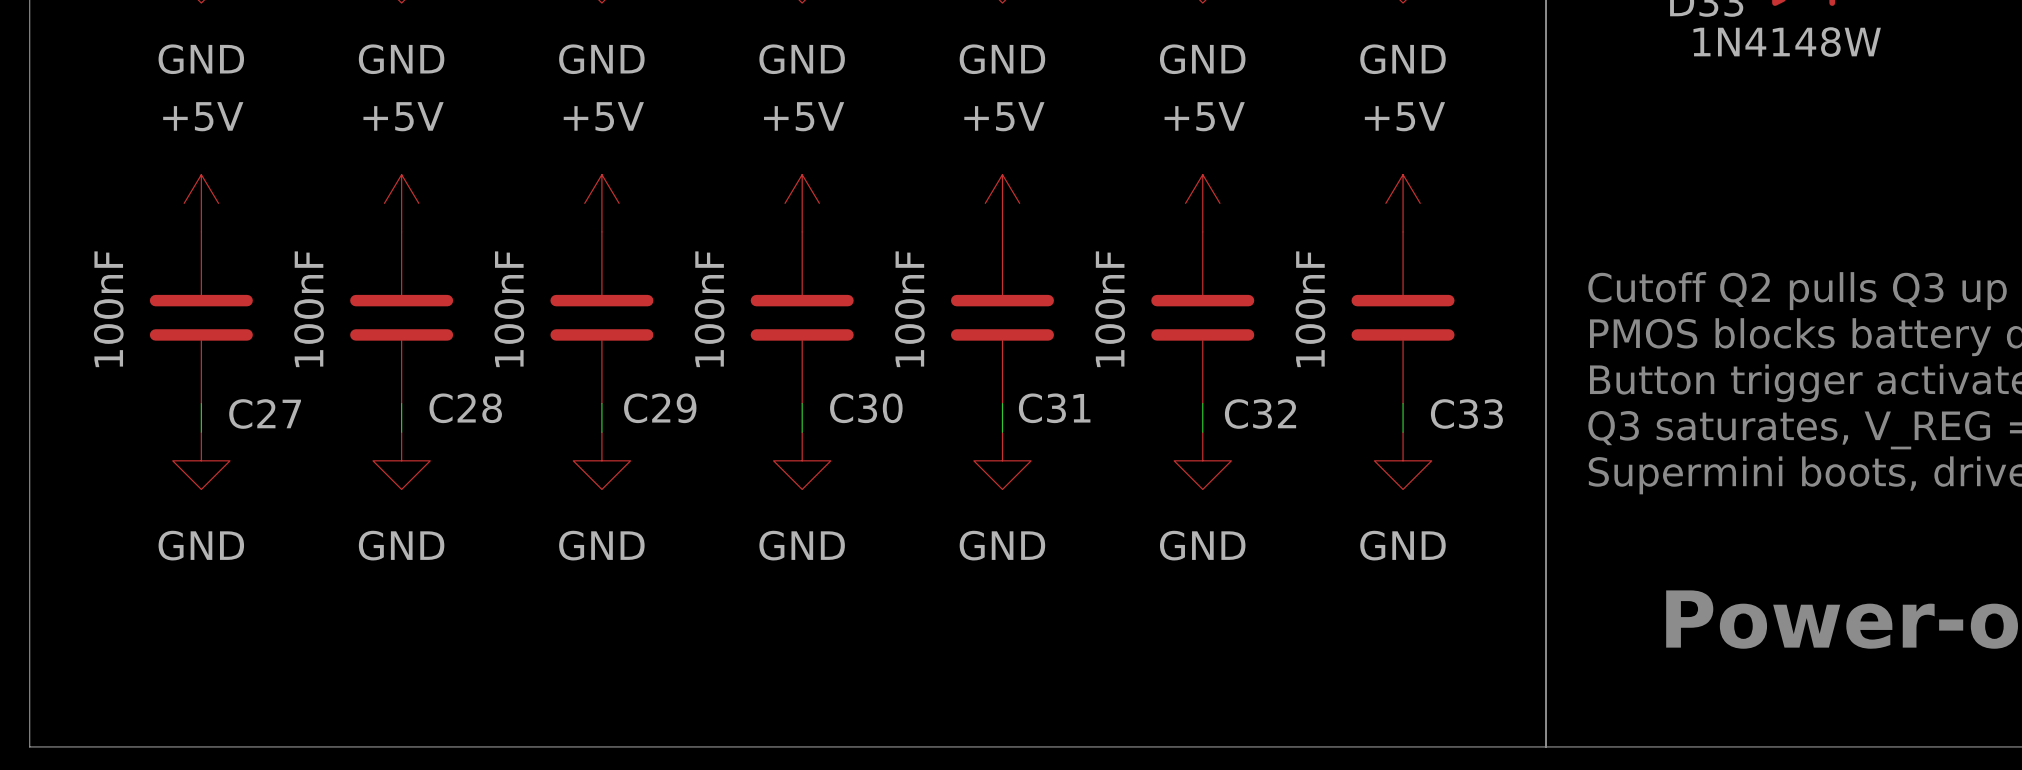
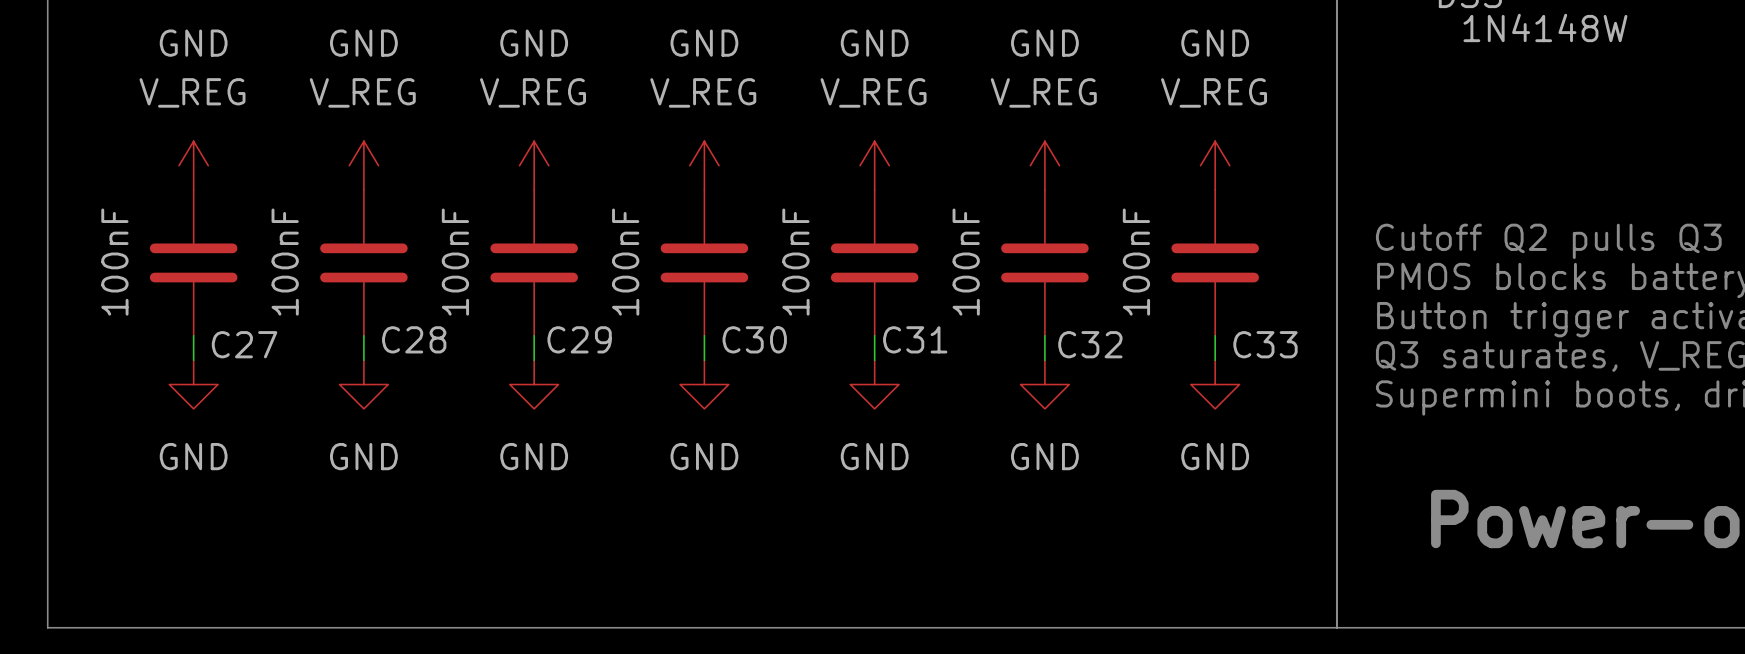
power symbol: +5V (201, 203) -> V_REG (193, 165)
power symbol: +5V (401, 203) -> V_REG (363, 165)
power symbol: +5V (601, 203) -> V_REG (534, 165)
power symbol: +5V (802, 203) -> V_REG (704, 165)
power symbol: +5V (1002, 203) -> V_REG (874, 165)
power symbol: +5V (1202, 203) -> V_REG (1044, 165)
power symbol: +5V (1403, 203) -> V_REG (1215, 165)

